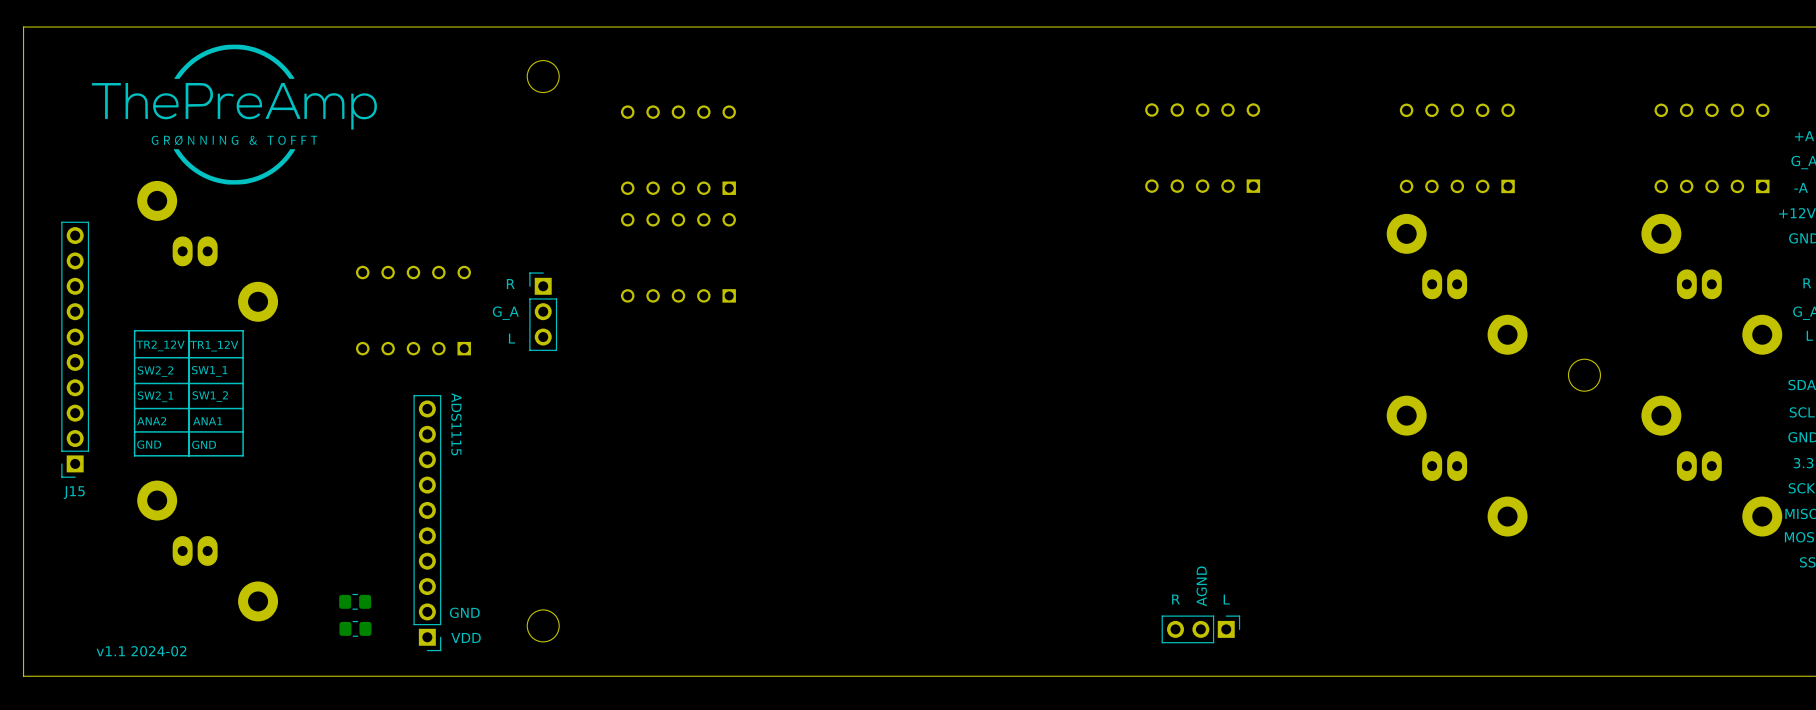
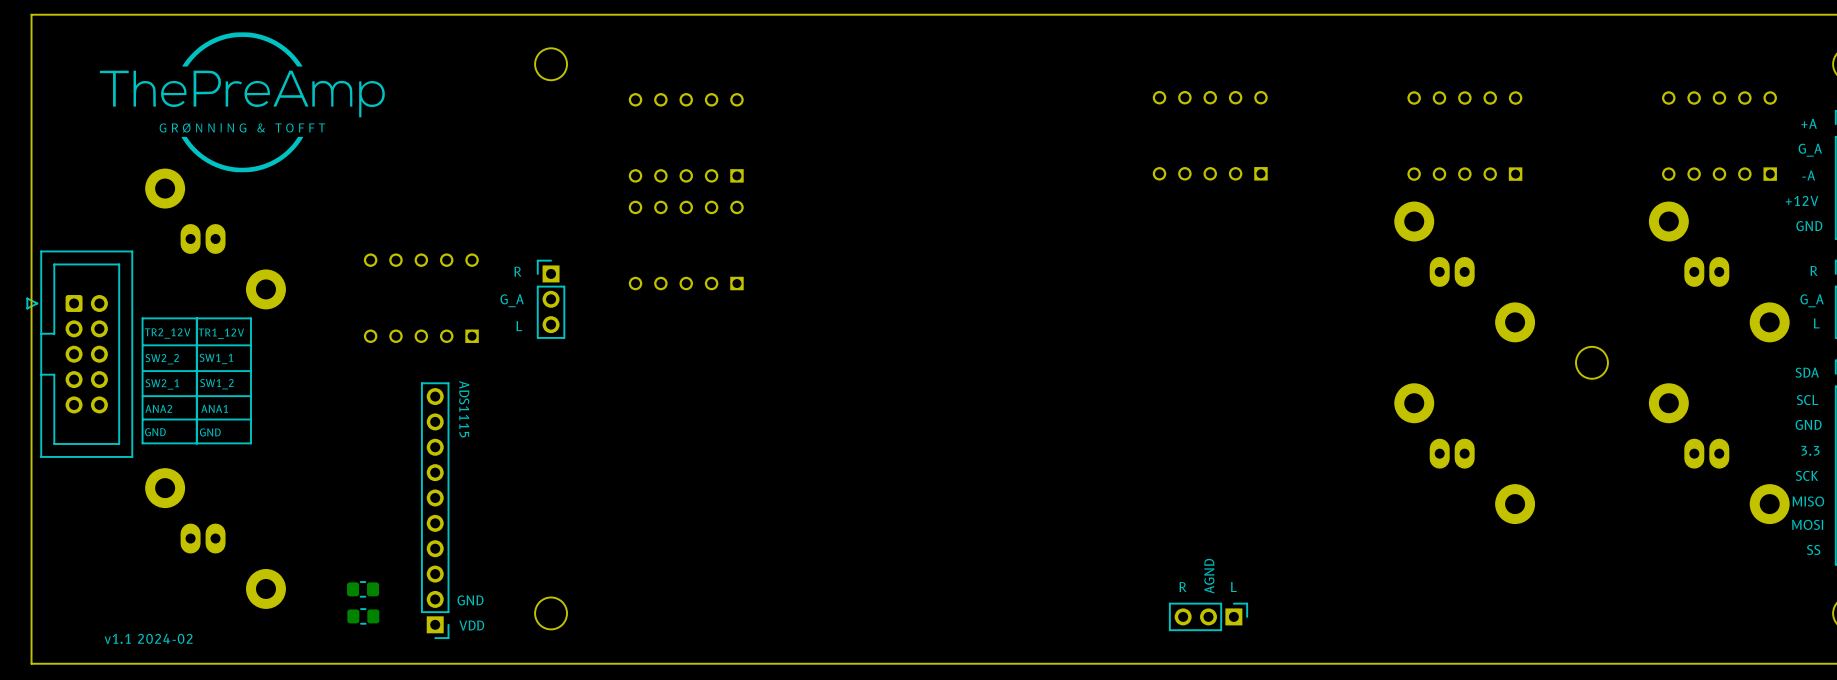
J15: (75, 349) -> none
part: none -> (79, 354)

